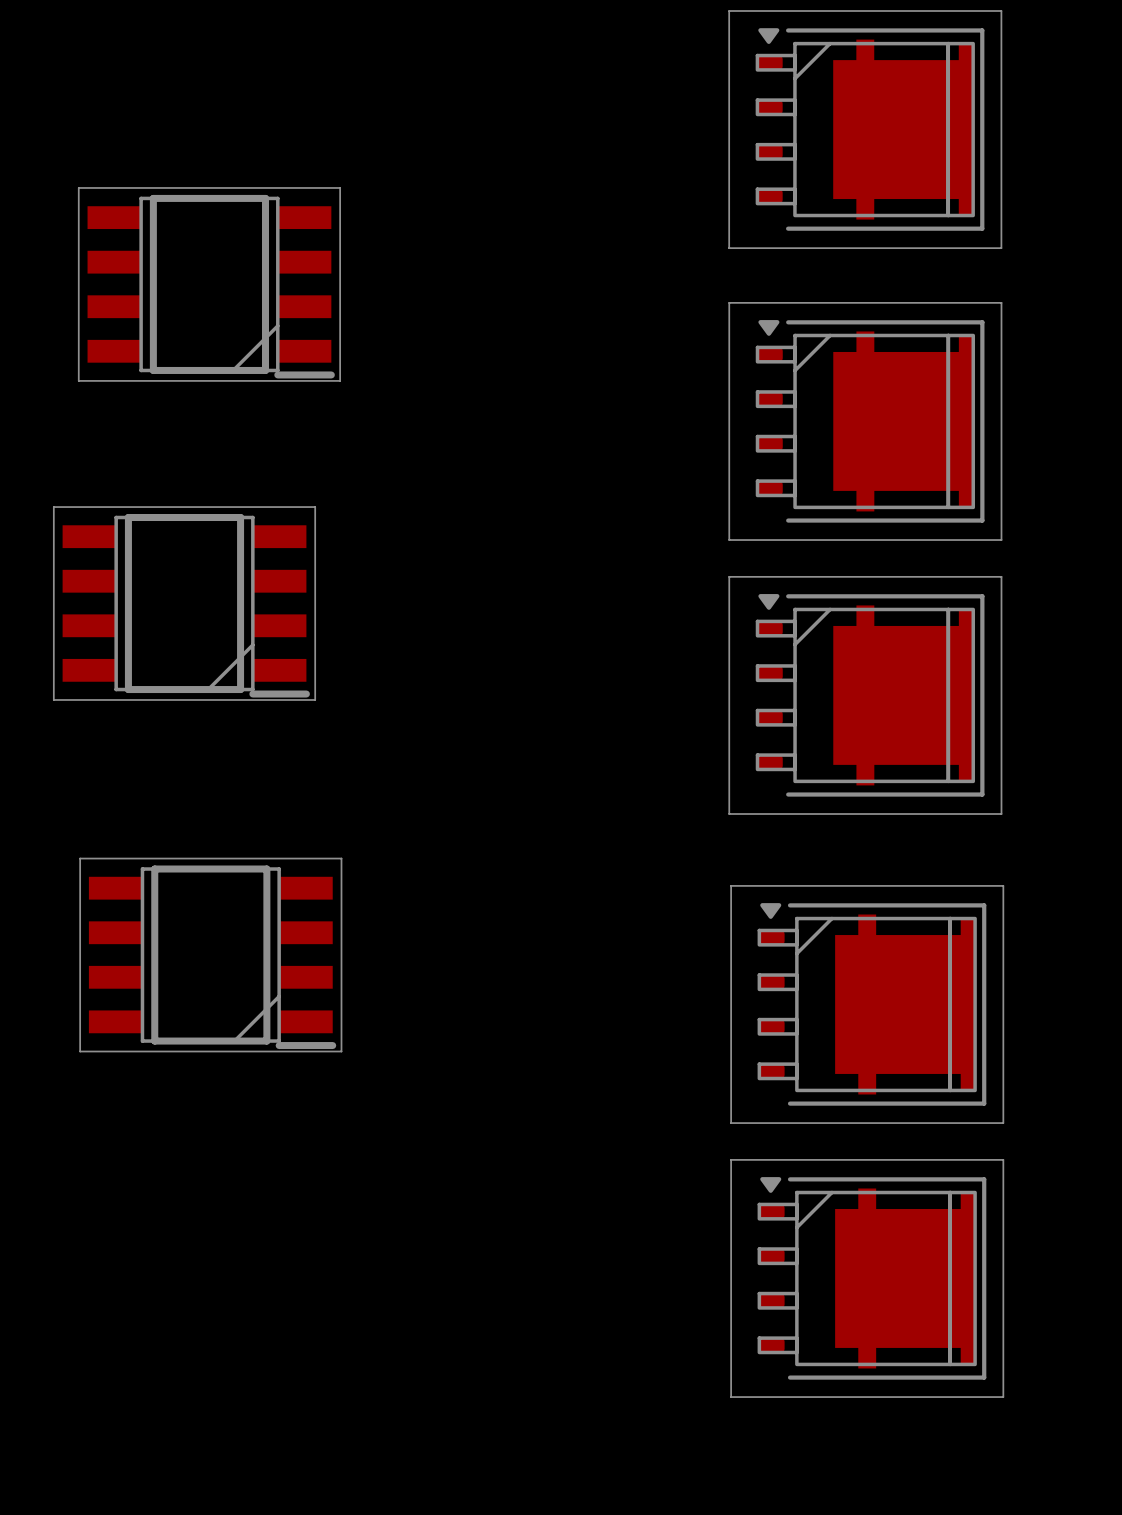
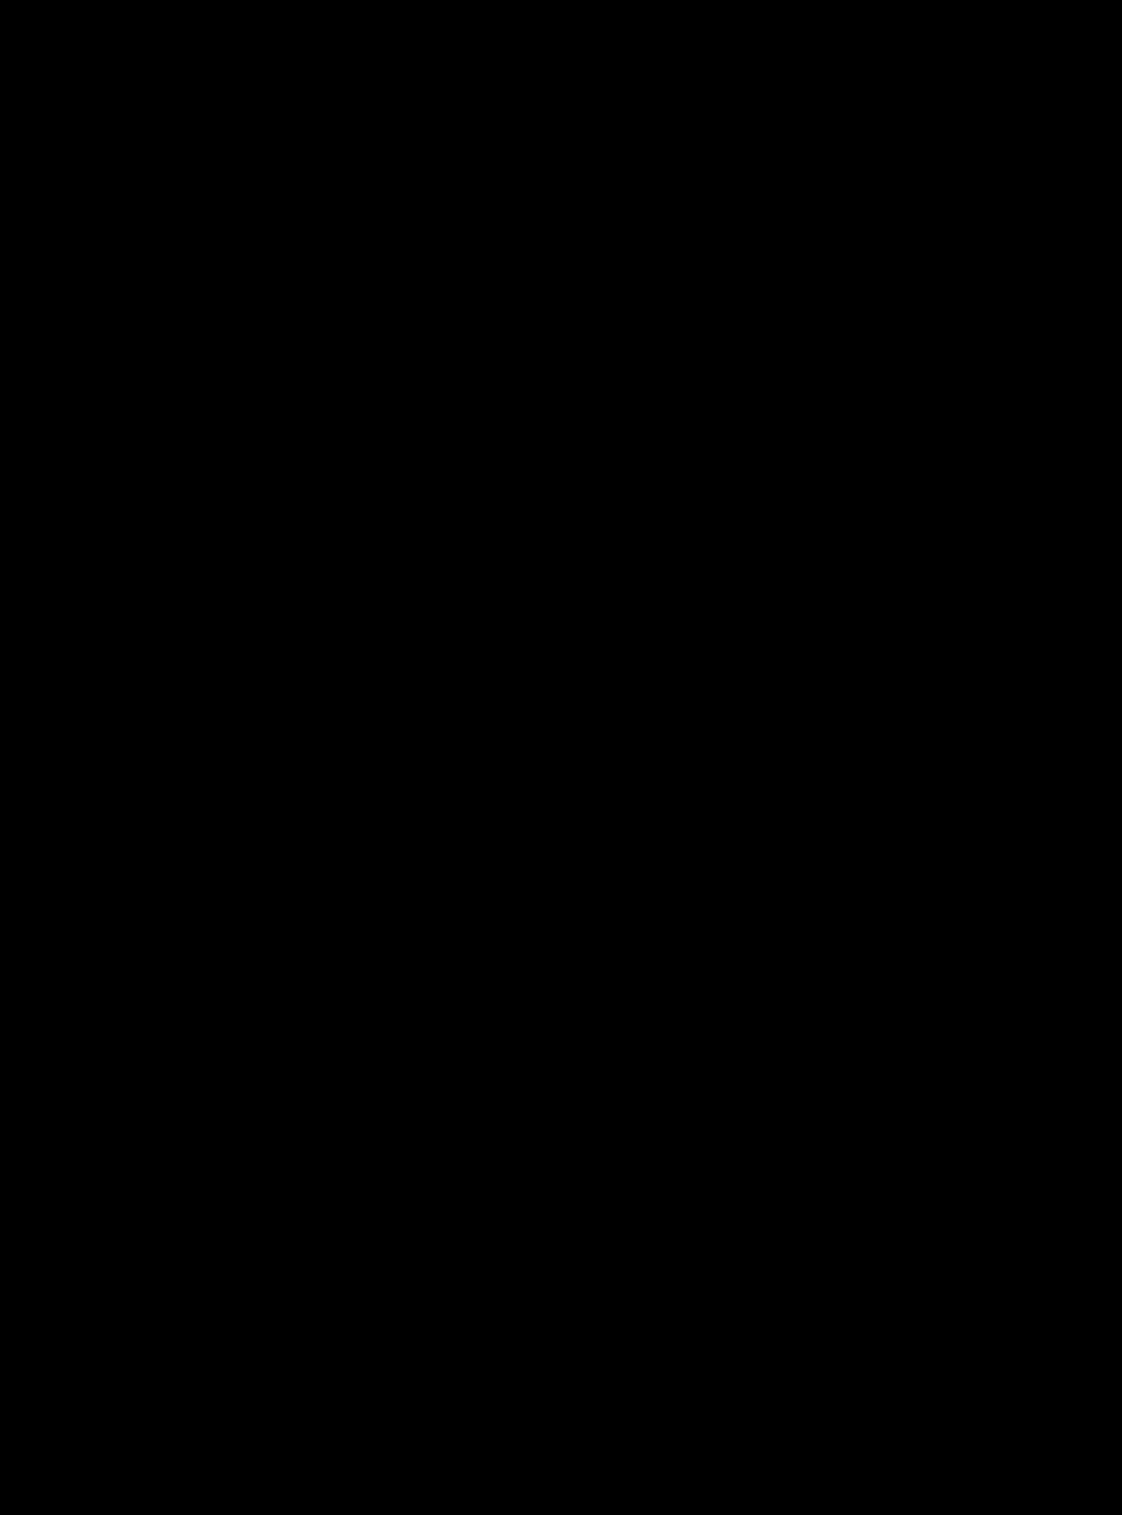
part: (865, 129) -> none
part: (209, 284) -> none
part: (865, 421) -> none
part: (184, 603) -> none
part: (865, 695) -> none
part: (210, 955) -> none
part: (867, 1004) -> none
part: (867, 1278) -> none

